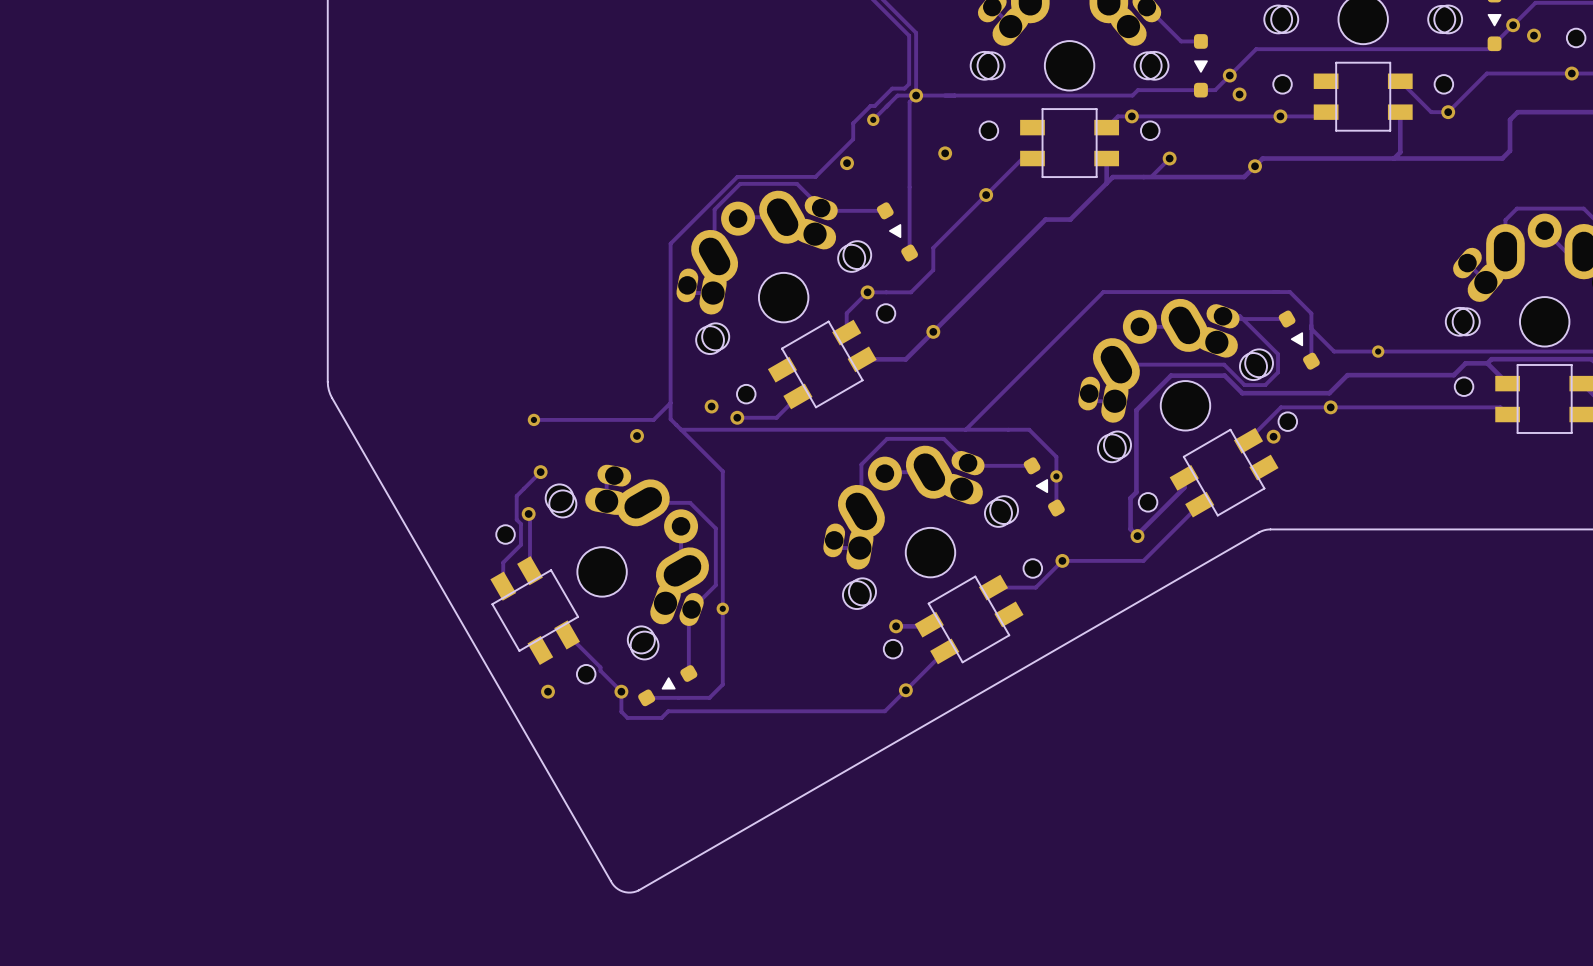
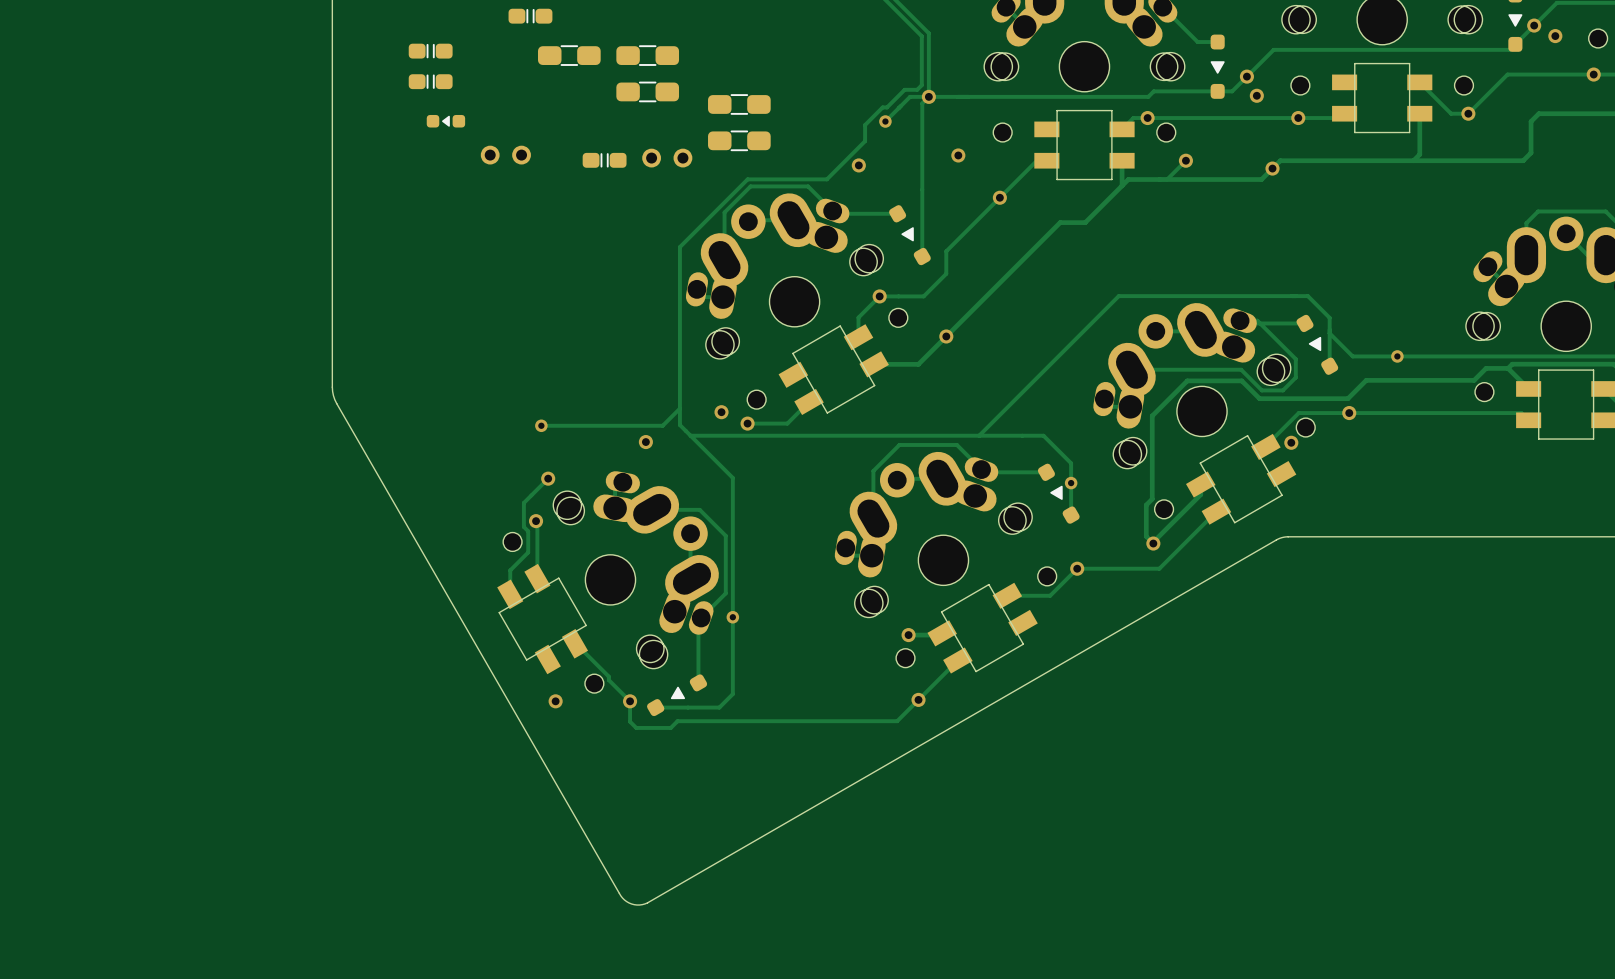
part: none -> (530, 16)
part: none -> (430, 51)
part: none -> (569, 55)
part: none -> (647, 55)
part: none -> (430, 81)
part: none -> (647, 91)
part: none -> (739, 104)
part: none -> (445, 121)
part: none -> (739, 140)
part: none -> (505, 155)
part: none -> (667, 158)
part: none -> (604, 160)

